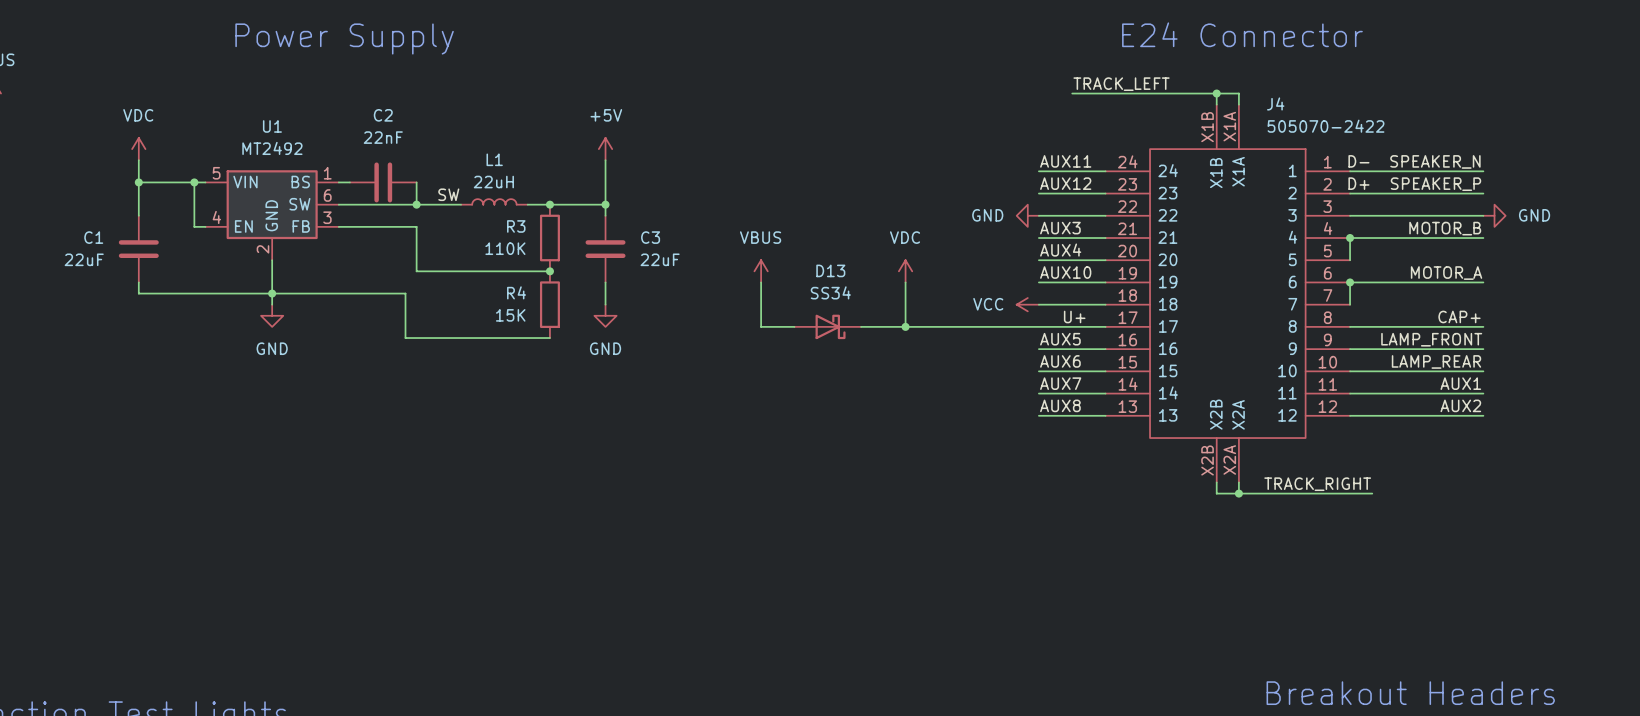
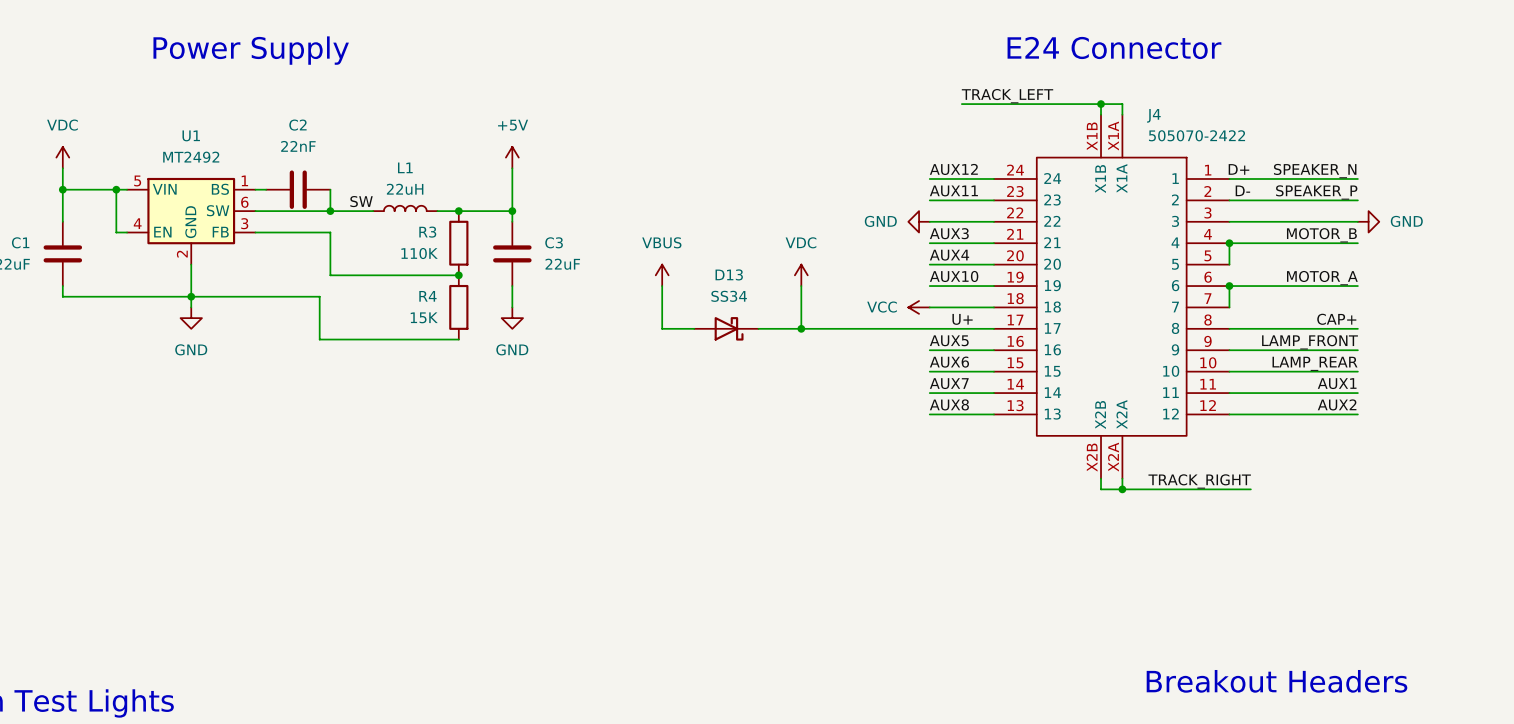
label: AUX11 (1065, 161) -> AUX12 (953, 169)
label: D- (1358, 161) -> D+ (1238, 169)
label: AUX12 (1065, 183) -> AUX11 (953, 190)
label: D+ (1358, 183) -> D- (1242, 190)

